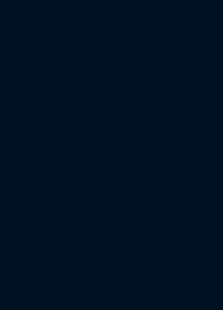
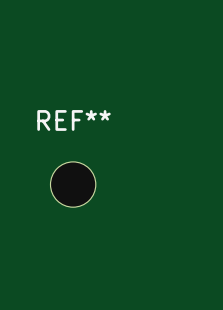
REF**: none -> (73, 184)

